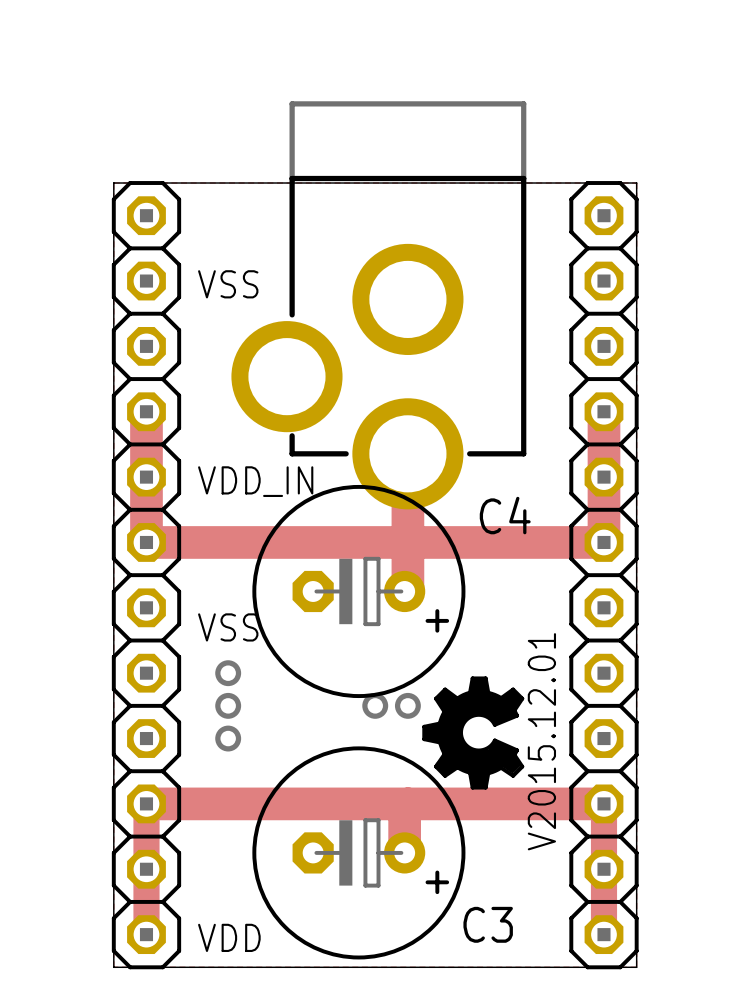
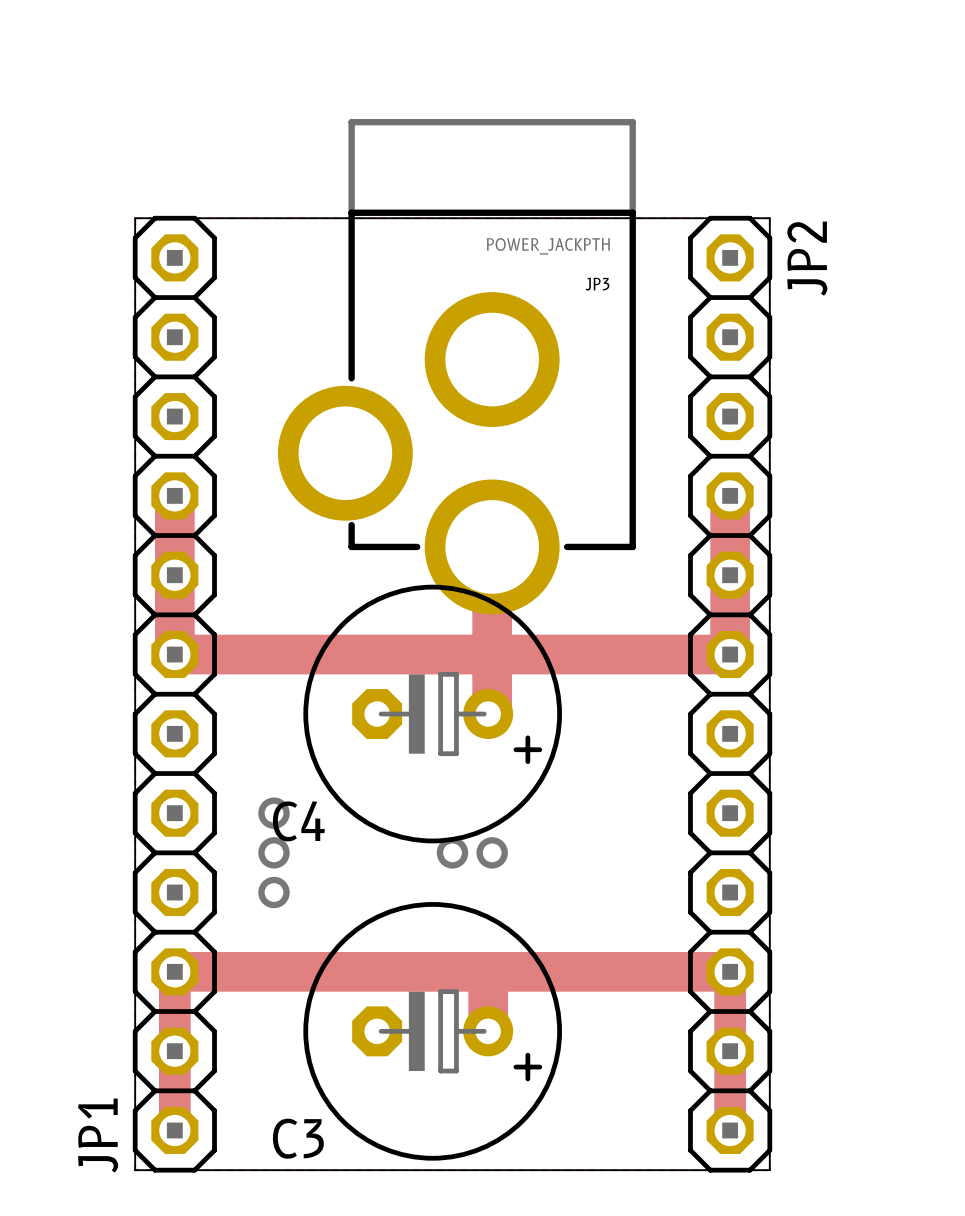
JP3 value: none -> POWER_JACKPTH (548, 246)
JP2 name: none -> JP2 (807, 258)
JP3 name: none -> JP3 (597, 284)
text: VSS (228, 284) -> none
text: VDD_IN (255, 481) -> none
C4 name position: C4 (505, 515) -> C4 (298, 821)
text: VSS (228, 627) -> none
drawing: [422, 676, 525, 790] -> none
text: V2015.12.01 (541, 741) -> none
C3 name position: C3 (488, 924) -> C3 (298, 1138)
JP1 name: none -> JP1 (98, 1135)
text: VDD (229, 937) -> none

